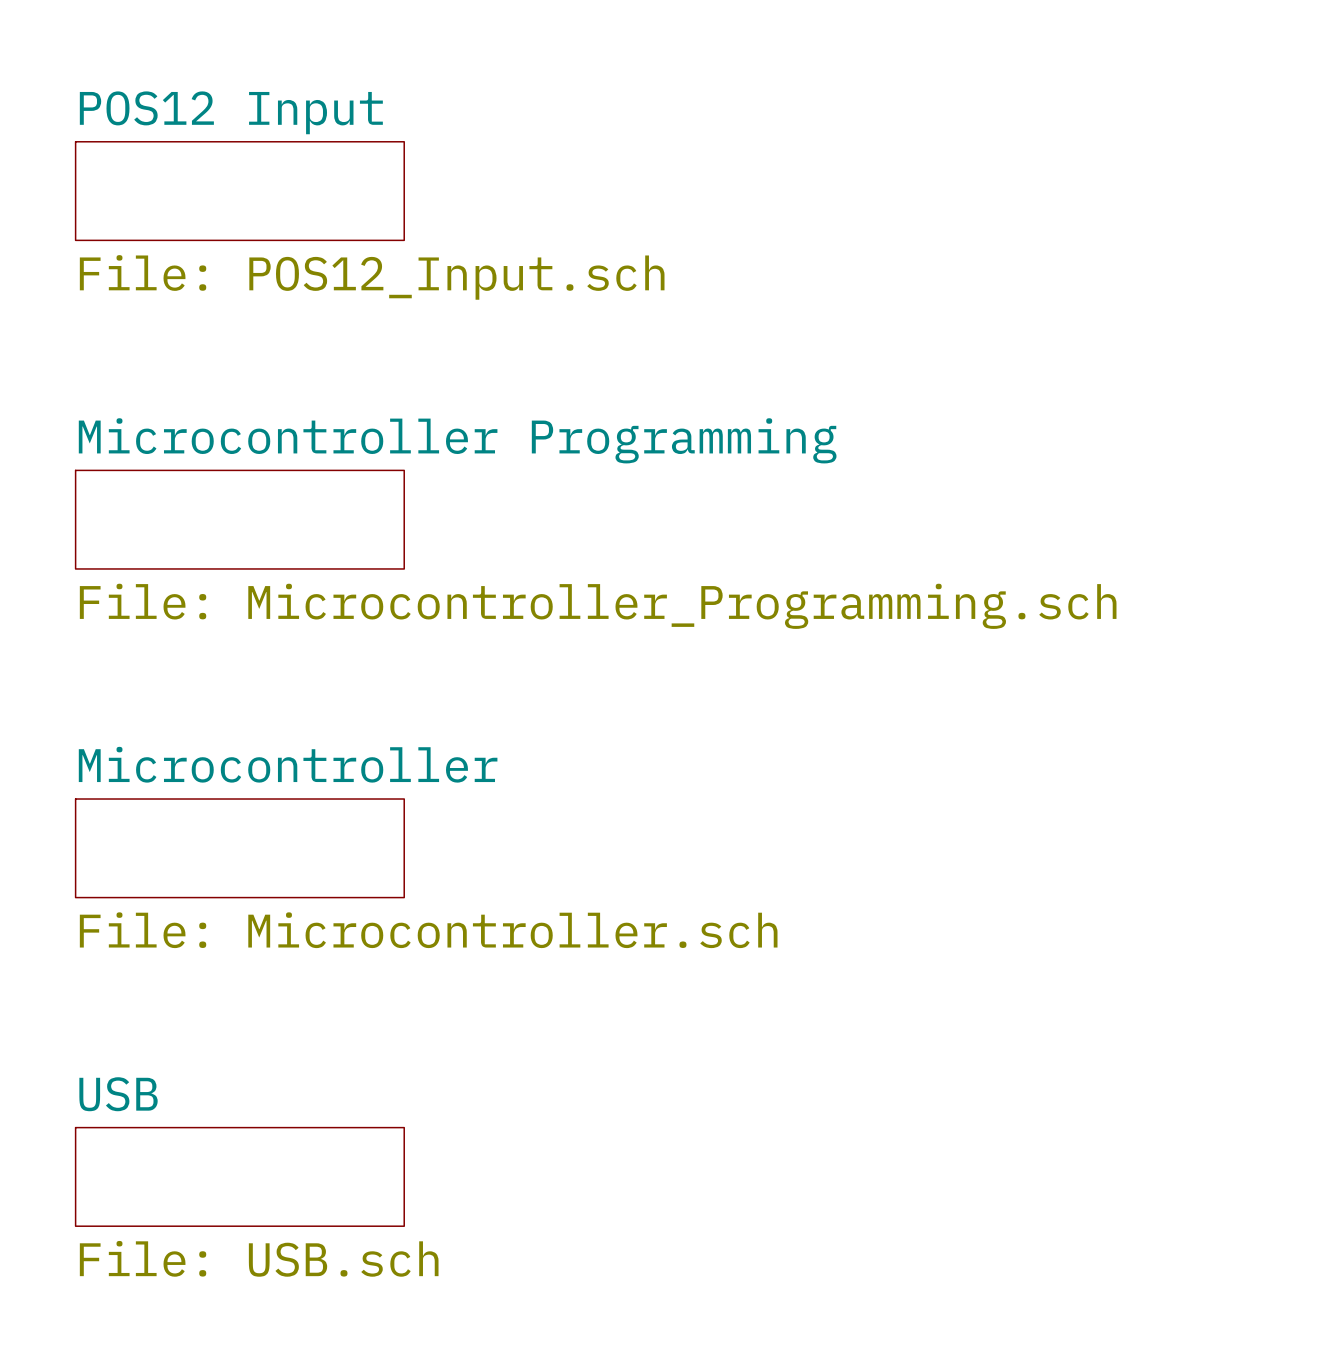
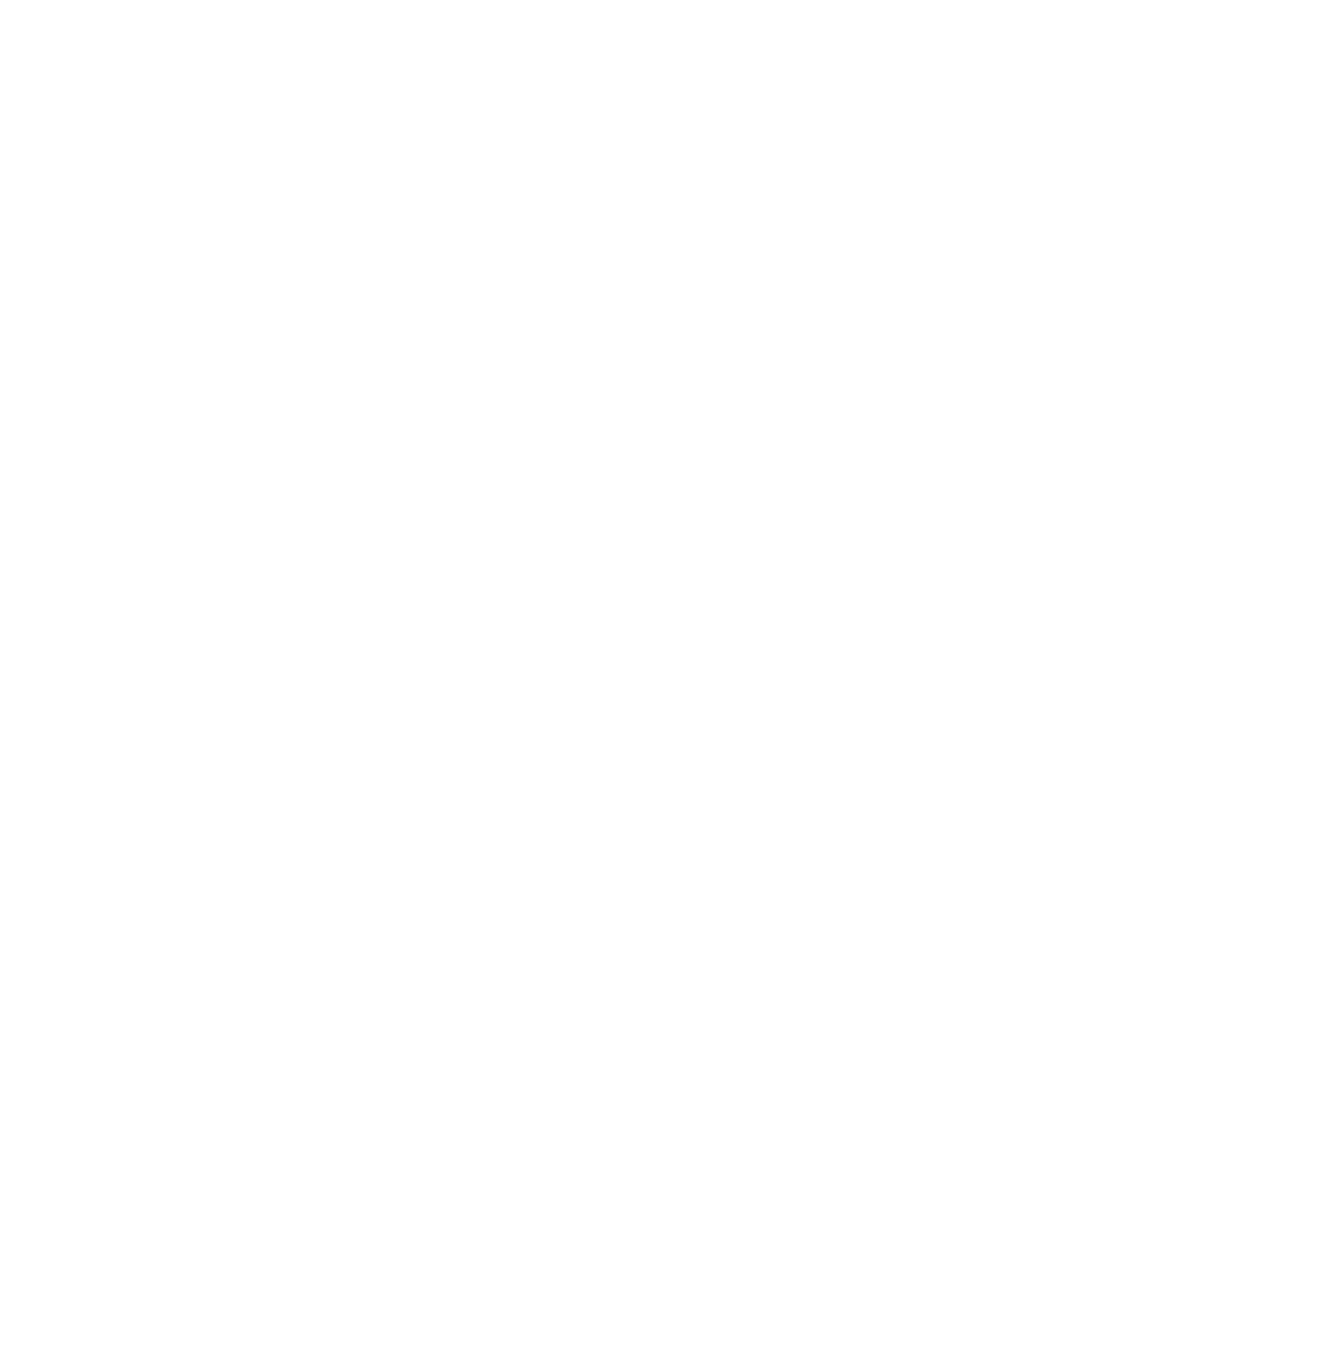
sheet POS12 Input: File: POS12_Input.sch (239, 191) -> none
sheet Microcontroller Programming: File: Microcontroller_Programming.sch (239, 519) -> none
sheet Microcontroller: File: Microcontroller.sch (239, 848) -> none
sheet USB: File: USB.sch (239, 1176) -> none

